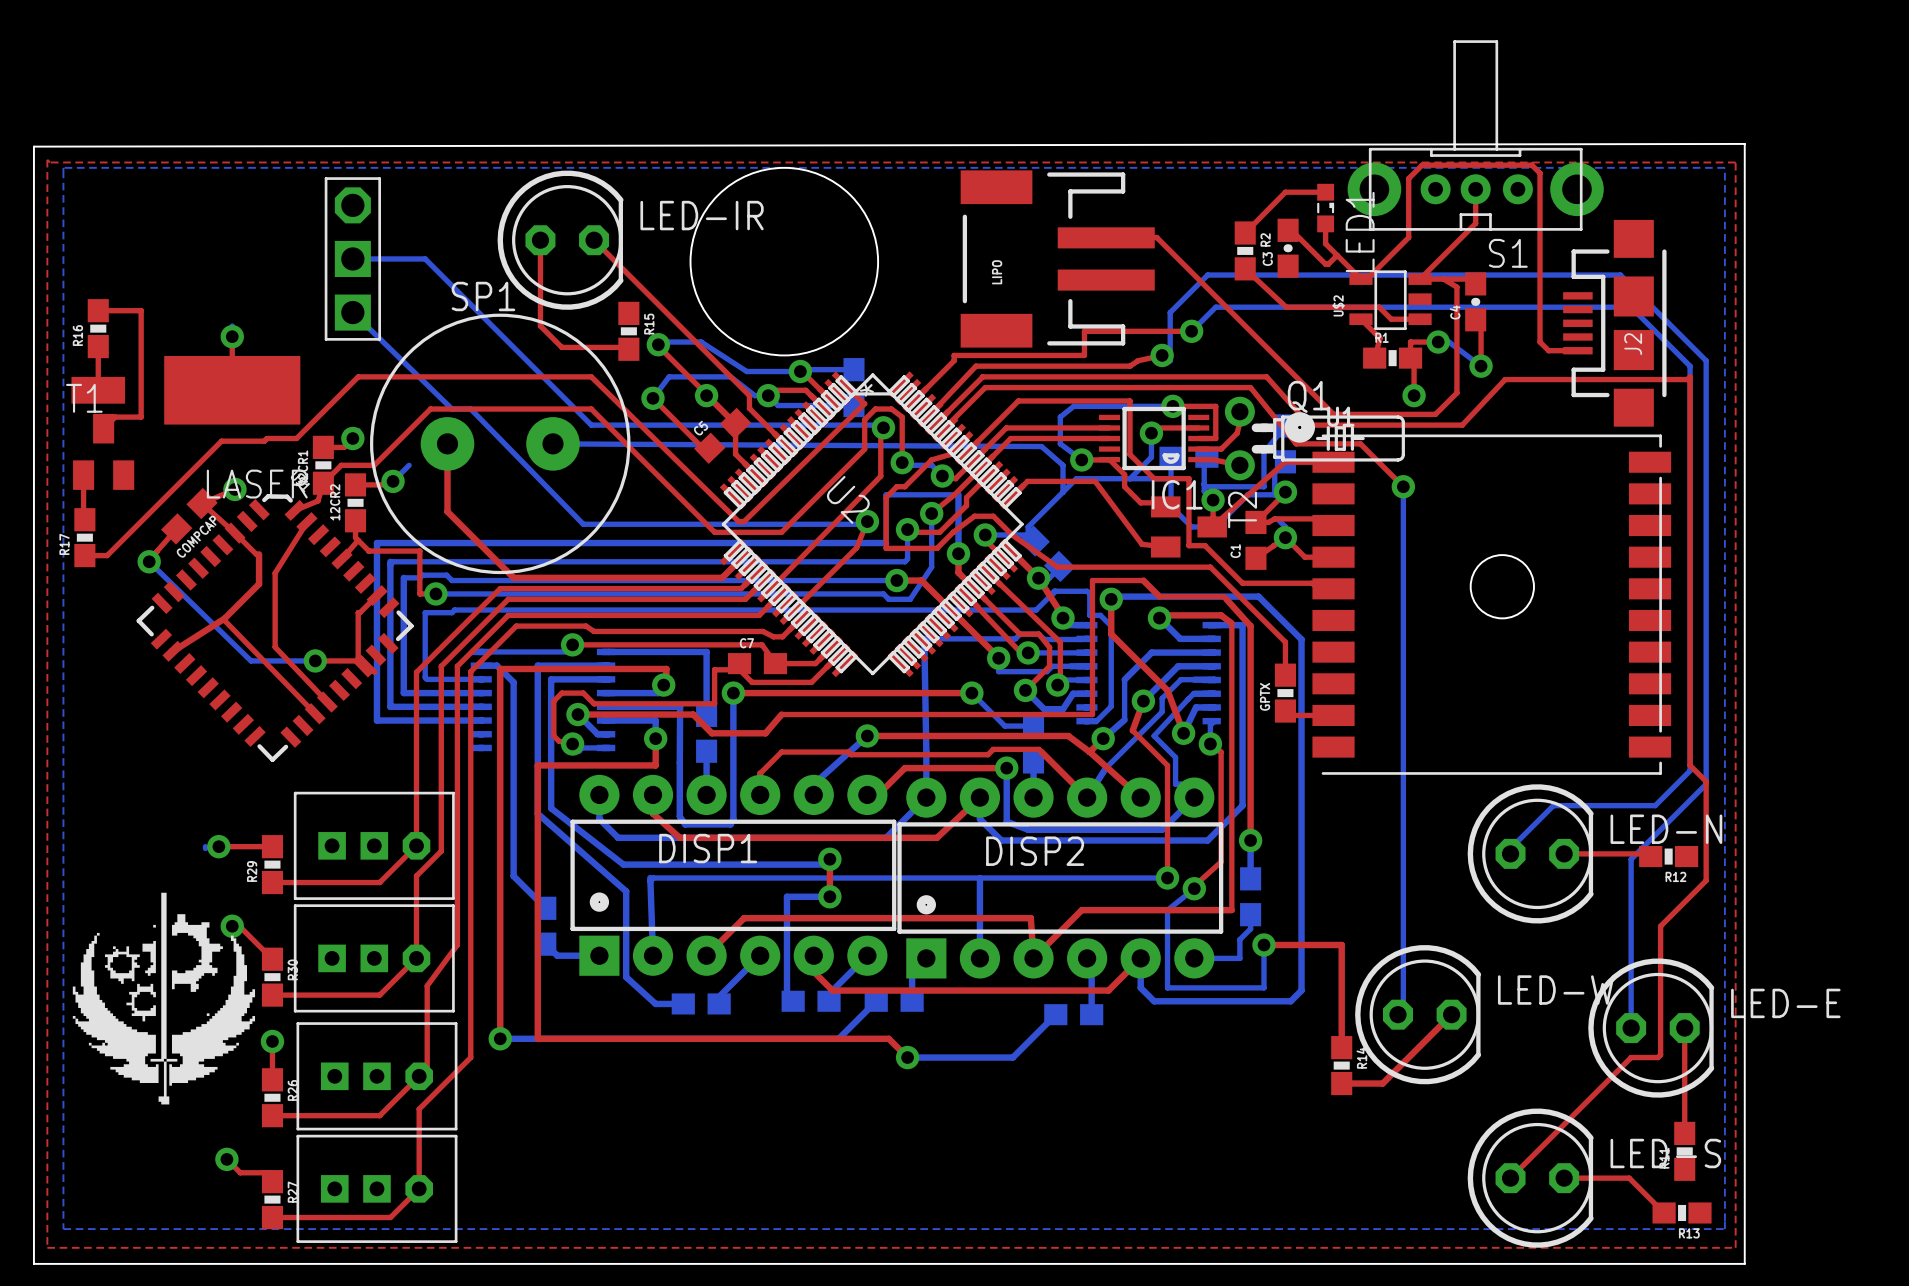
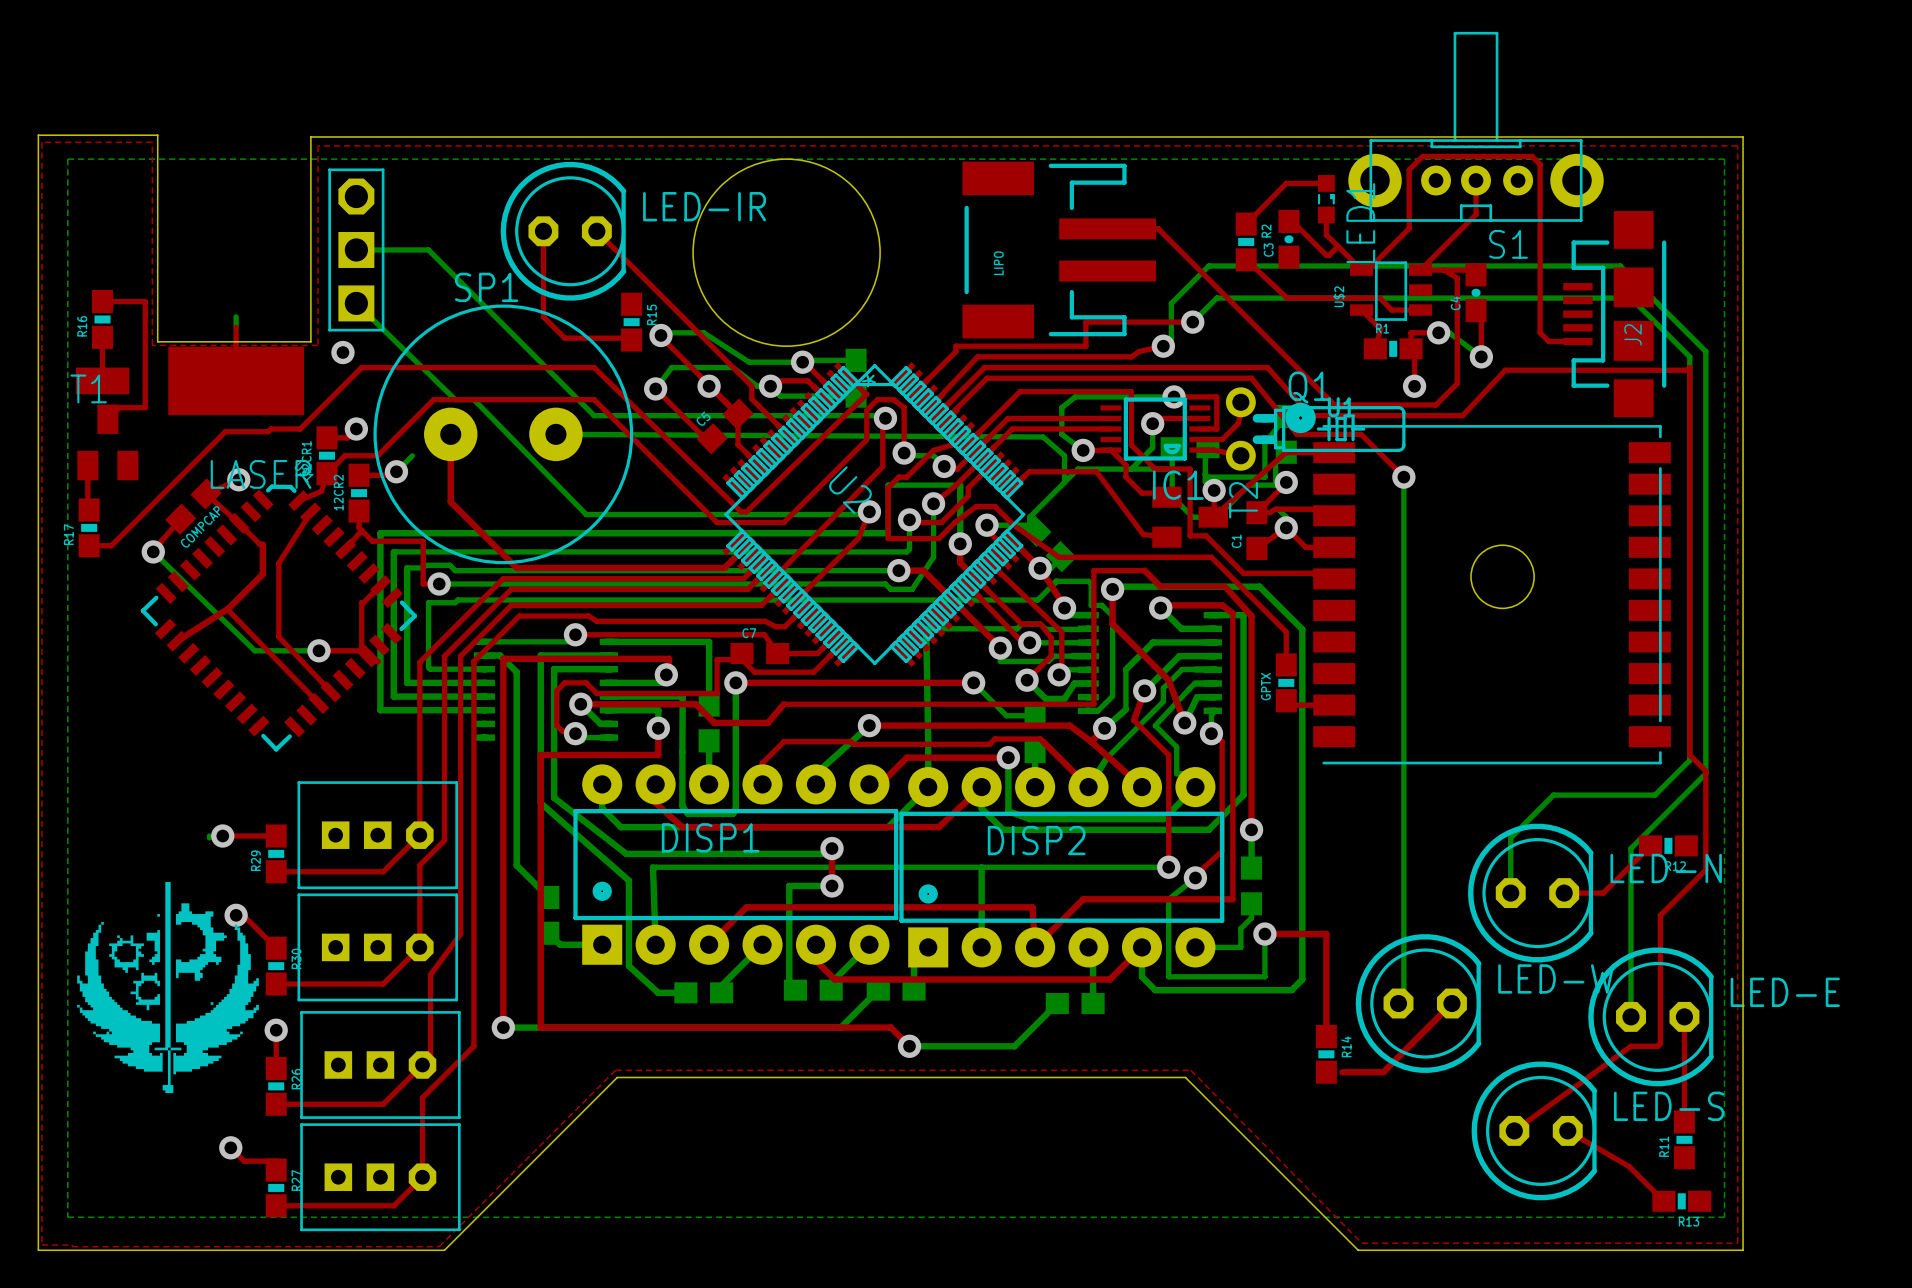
board edge: (33, 146) (1744, 143) (1744, 1263) (33, 1263) (33, 1262) -> (38, 137) (38, 135) (157, 135) (157, 341) (310, 341) (310, 136) (1743, 136) (1743, 1250) (1358, 1250) (1185, 1077) (617, 1077) (444, 1250) (38, 1250)
top zone outline: (47, 159) (47, 1247) (1735, 1247) (1735, 162) (50, 162) (47, 159) -> (41, 142) (41, 1244) (72, 1244) (72, 1246) (439, 1246) (615, 1070) (1190, 1070) (1361, 1243) (1737, 1243) (1737, 145) (318, 145) (318, 345) (152, 345) (152, 142) (41, 142)
via position: (232, 336) -> (342, 352)
bottom track: none -> (1510, 843) (1510, 893)
LED-N position: (1530, 853) -> (1530, 893)
top track: (1564, 853) (1648, 853) -> none
top track: none -> (1650, 845) (1603, 893) (1564, 893)
top track: (1325, 945) (1341, 945) (1341, 1047) -> (1326, 934) (1326, 1036)
top track: (1631, 1057) (1510, 1178) -> (1631, 1046) (1514, 1130)
R14 position: (1341, 1065) -> (1326, 1054)
LED-S position: (1530, 1178) -> (1534, 1130)
top track: (1564, 1178) (1629, 1178) -> (1567, 1130) (1629, 1166)

